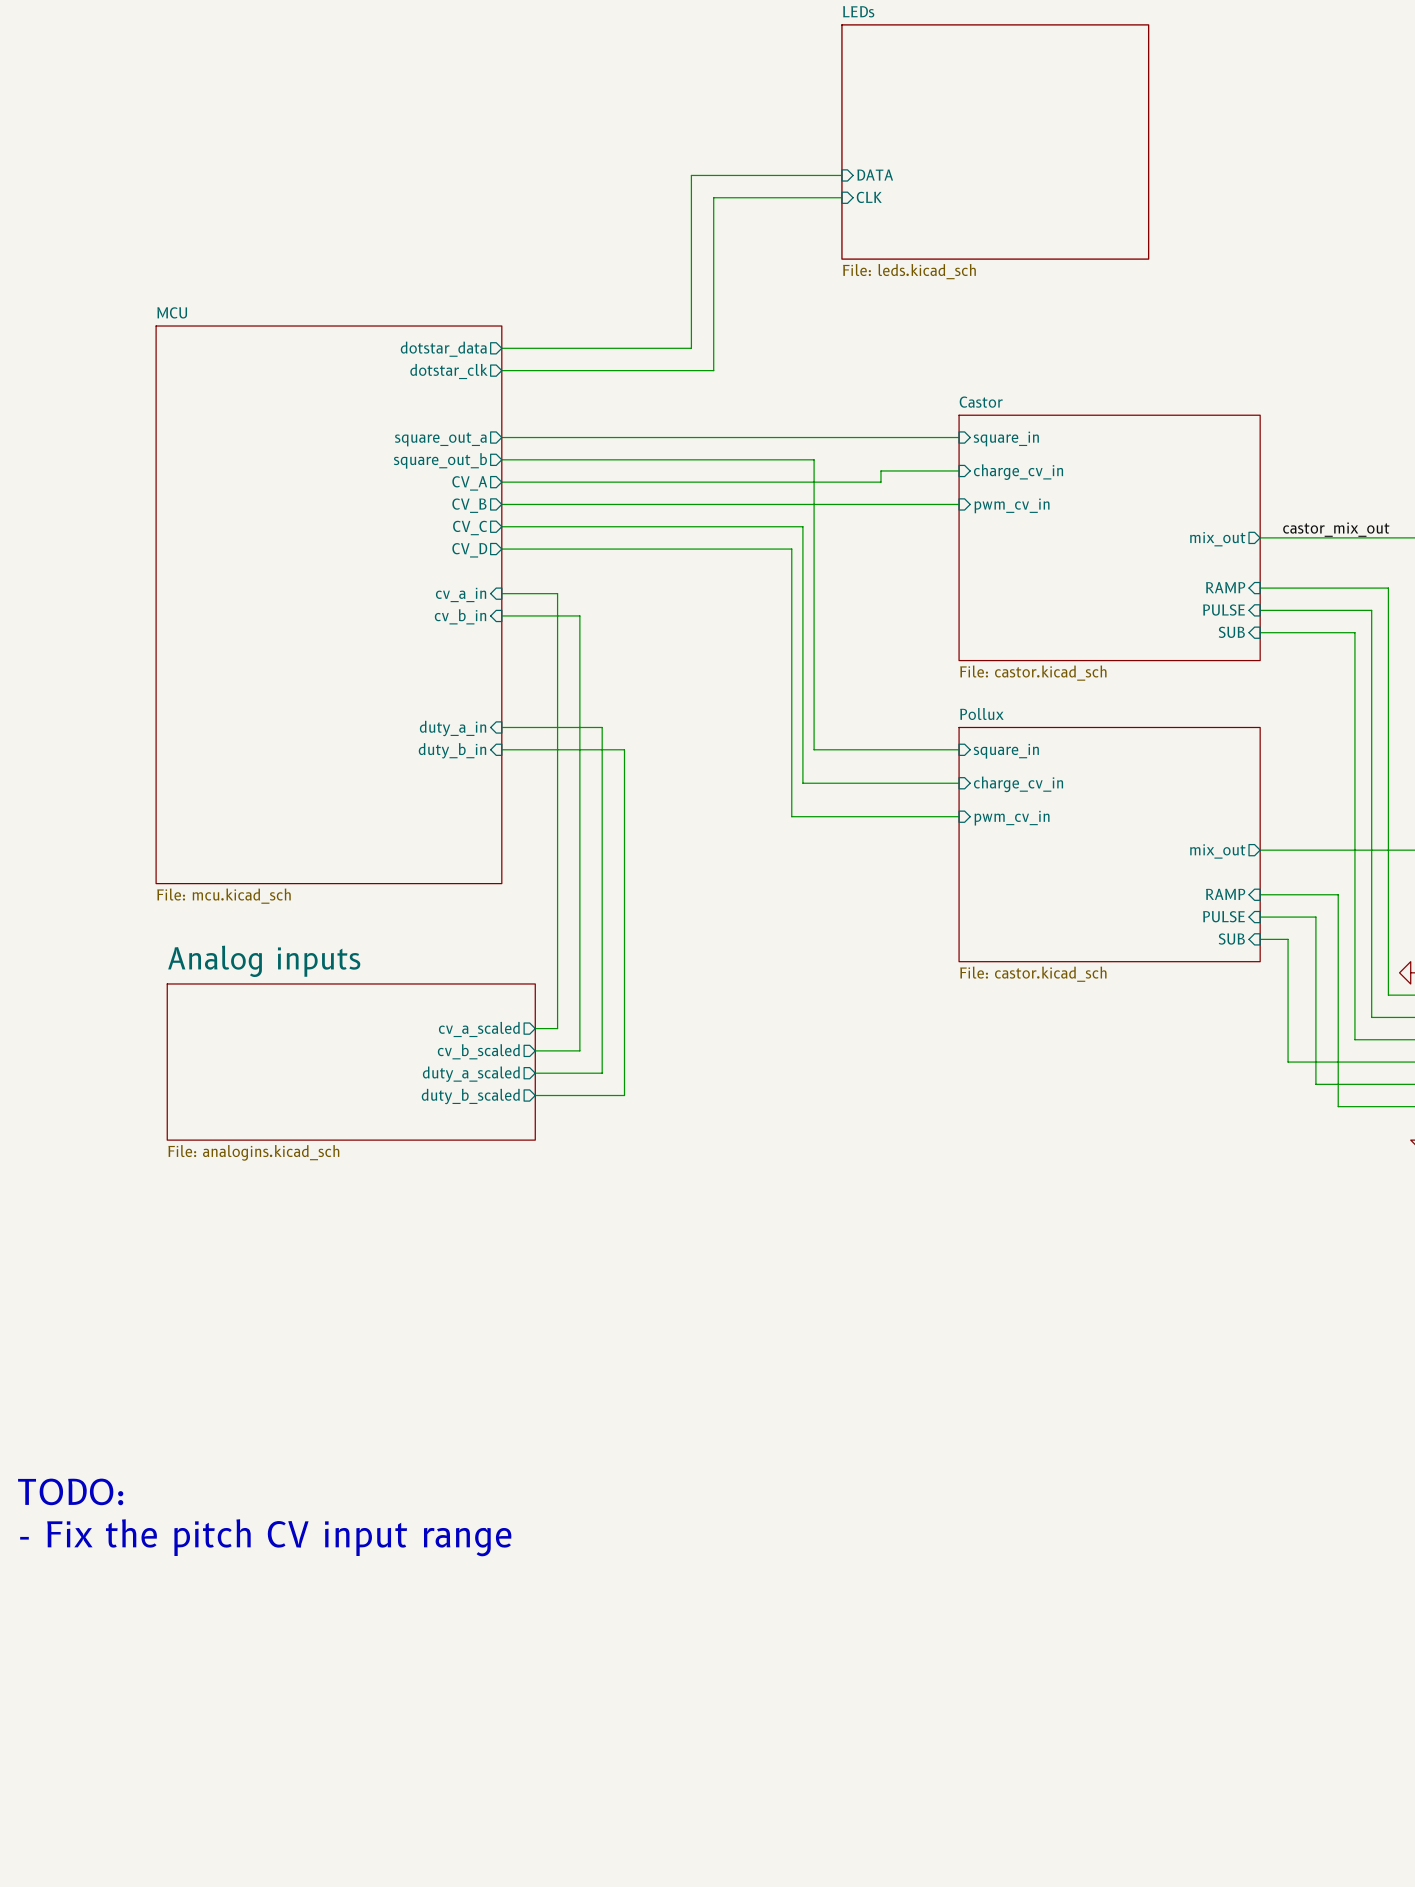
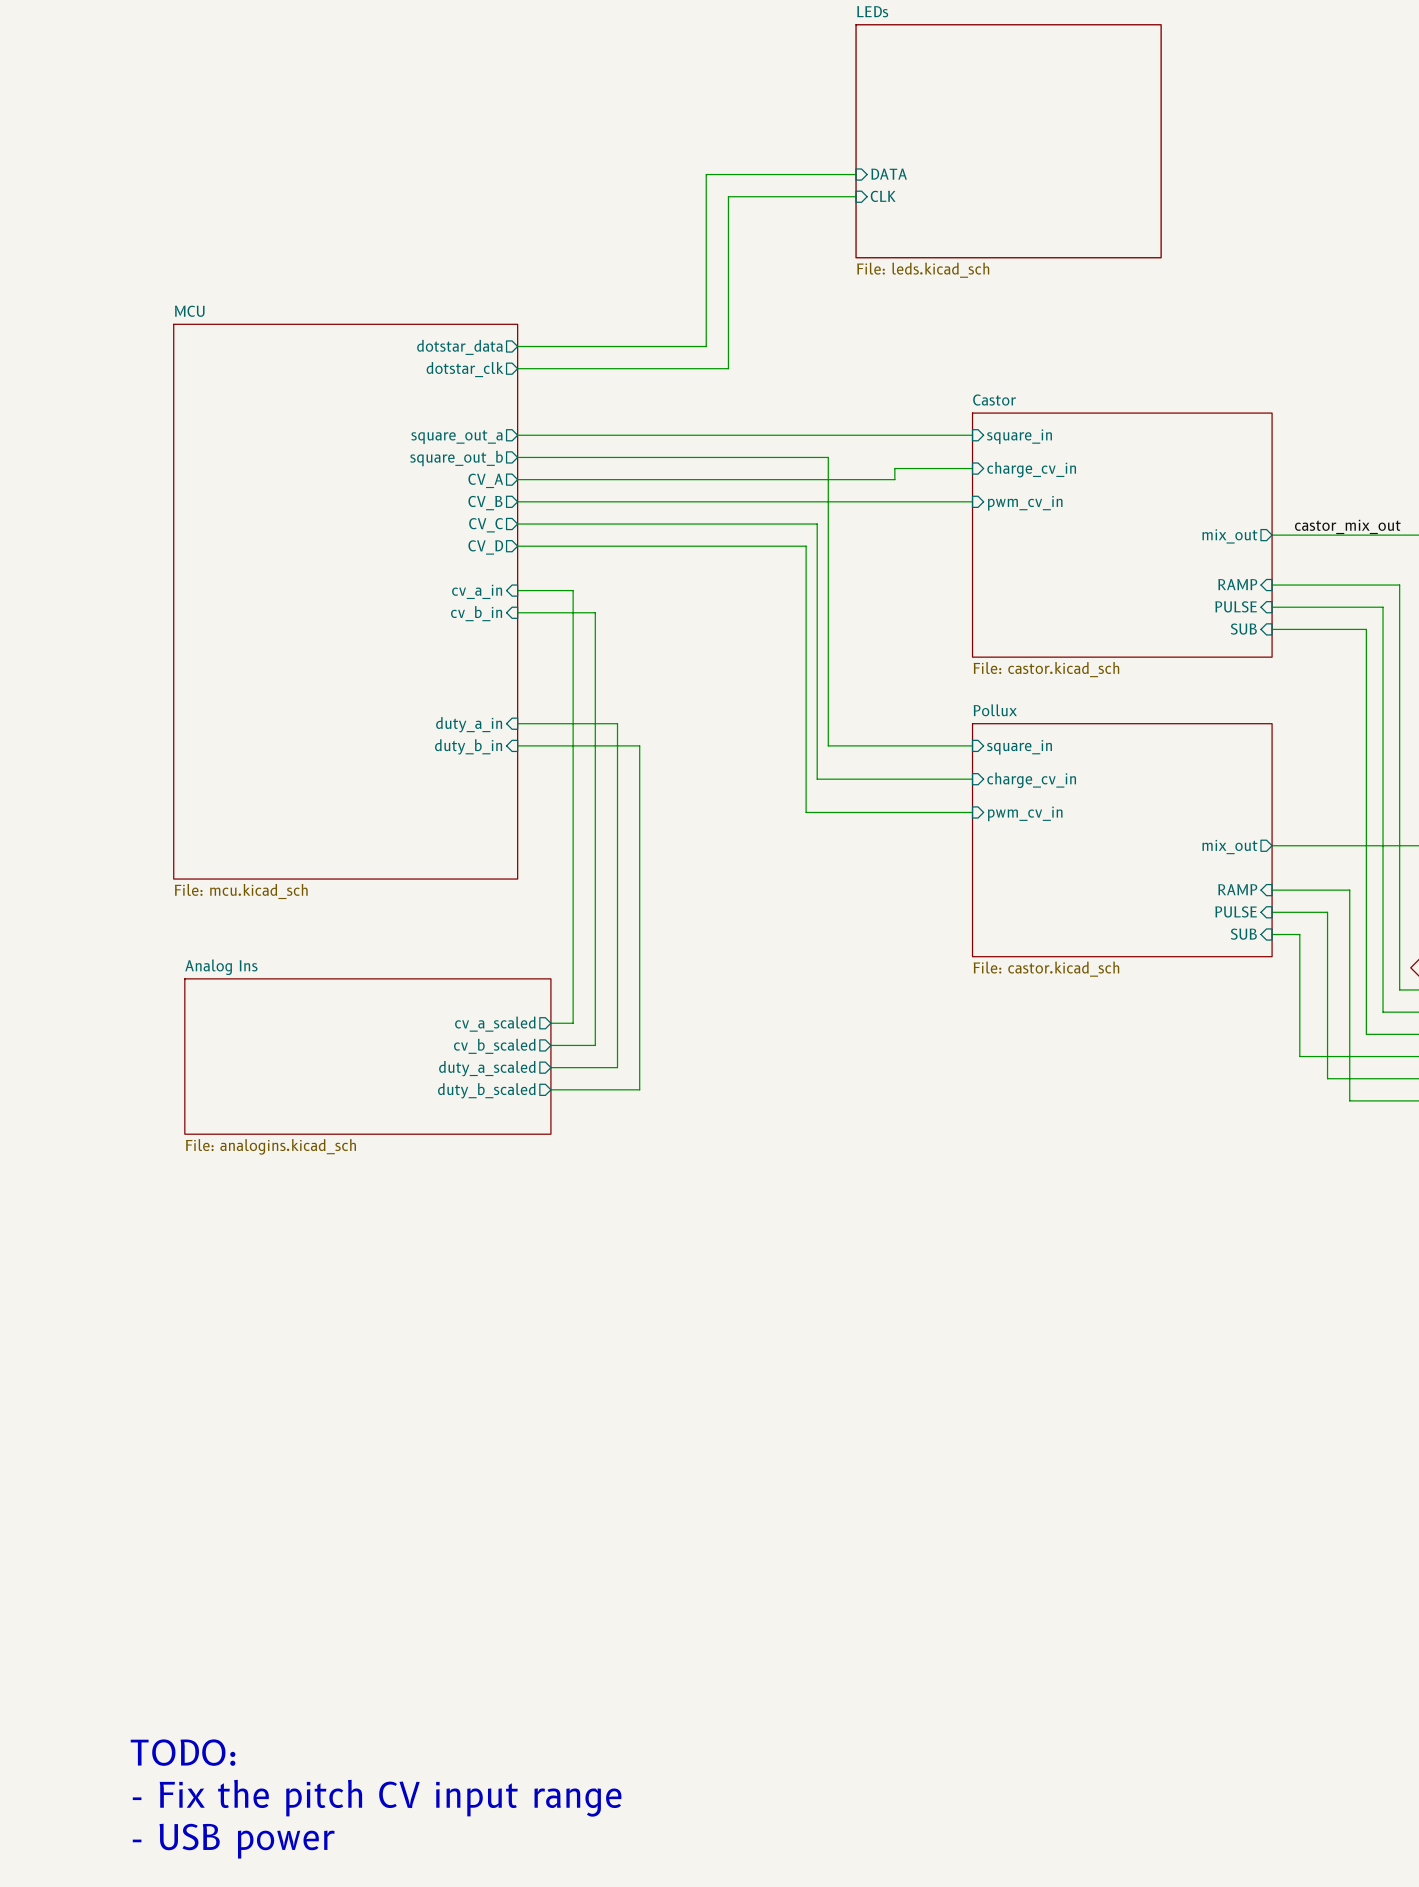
sheet Analog inputs name: Analog inputs (264, 961) -> Analog Ins (221, 967)
text: TODO: (70, 1491) -> none
text: - Fix the pitch CV input range (265, 1537) -> none
text: none -> TODO: (183, 1752)
text: none -> - Fix the pitch CV input range (377, 1798)
text: none -> - USB power (233, 1841)

